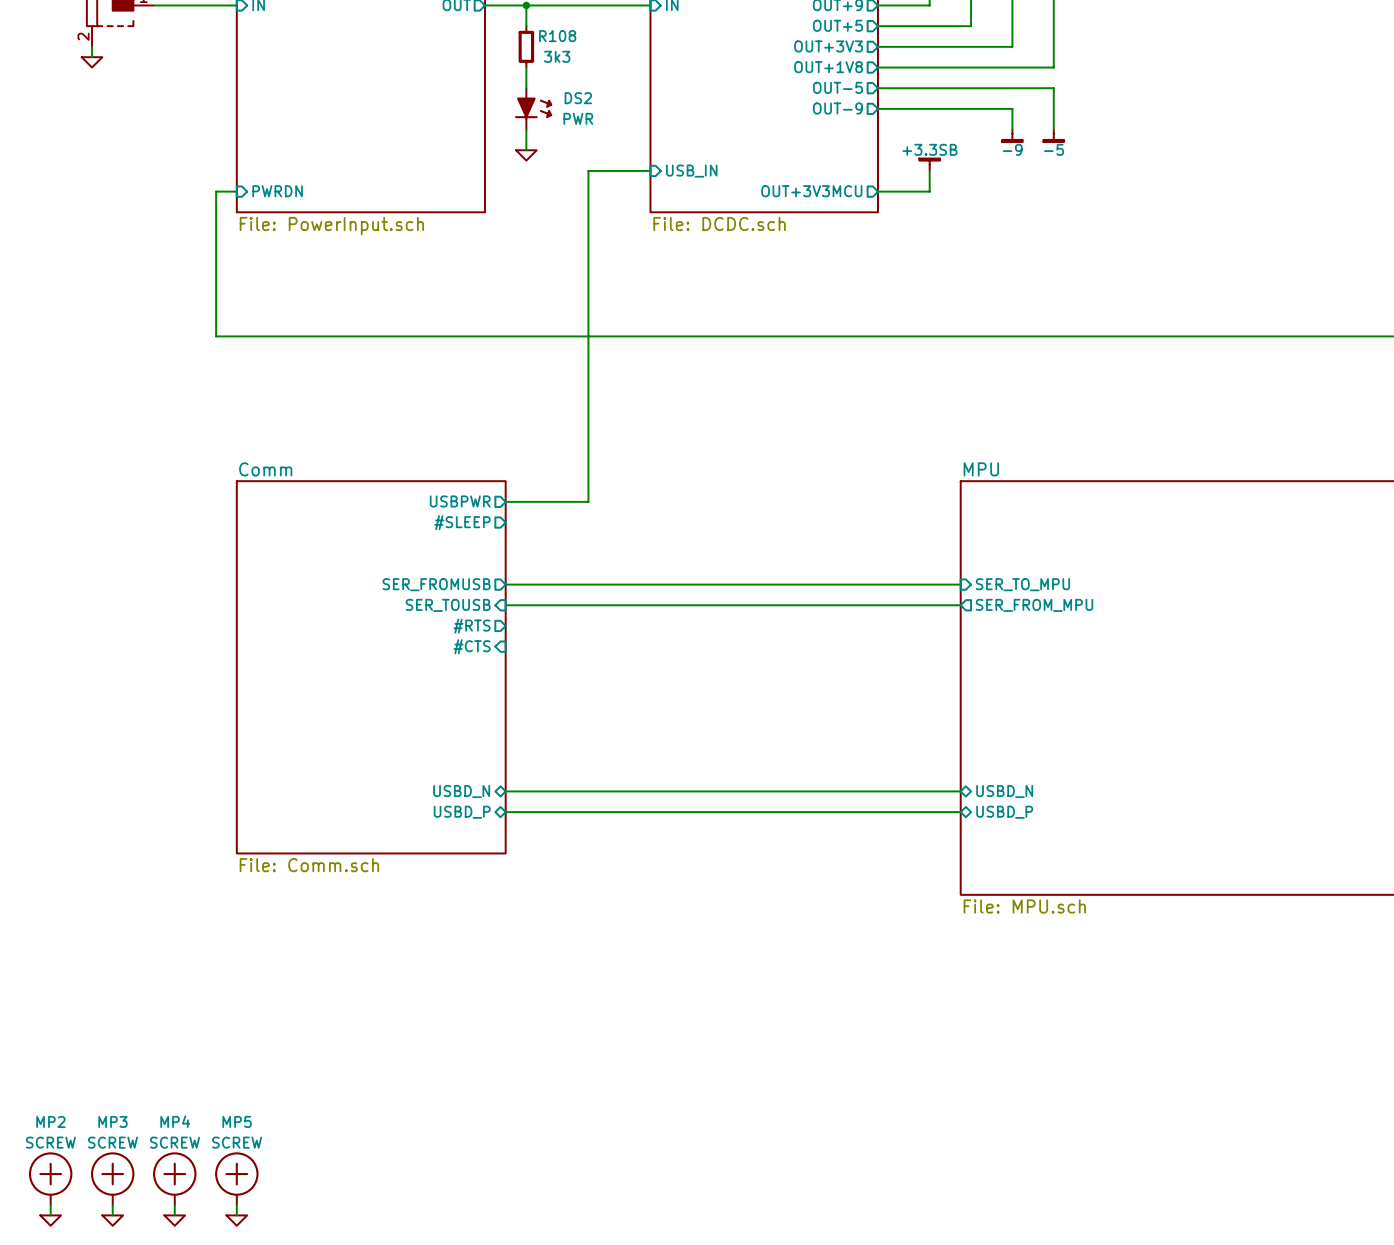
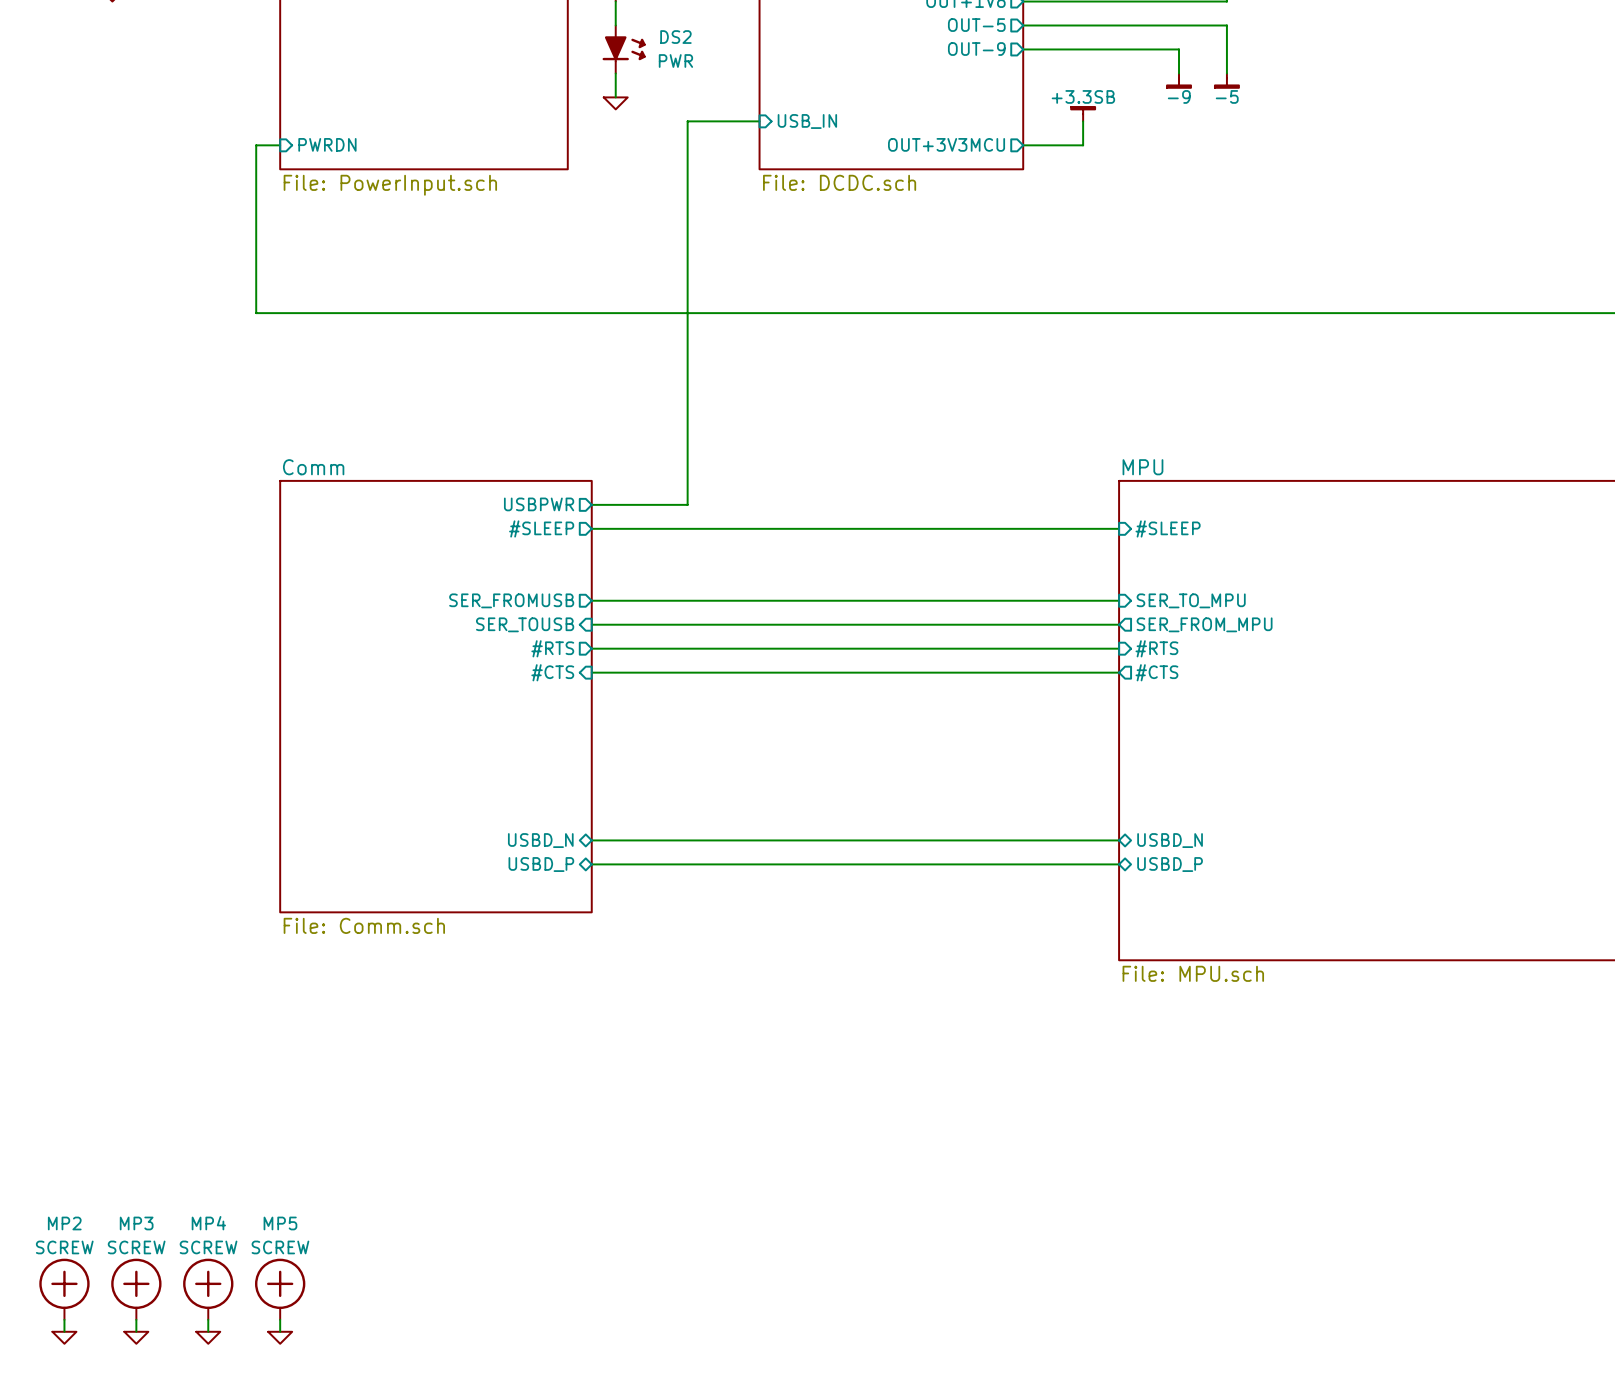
wire: none -> (591, 528) (1119, 528)
sheet pin: none -> #SLEEP (1168, 528)
wire: none -> (591, 648) (1119, 648)
sheet pin: none -> #RTS (1156, 648)
wire: none -> (591, 672) (1119, 672)
sheet pin: none -> #CTS (1156, 672)

